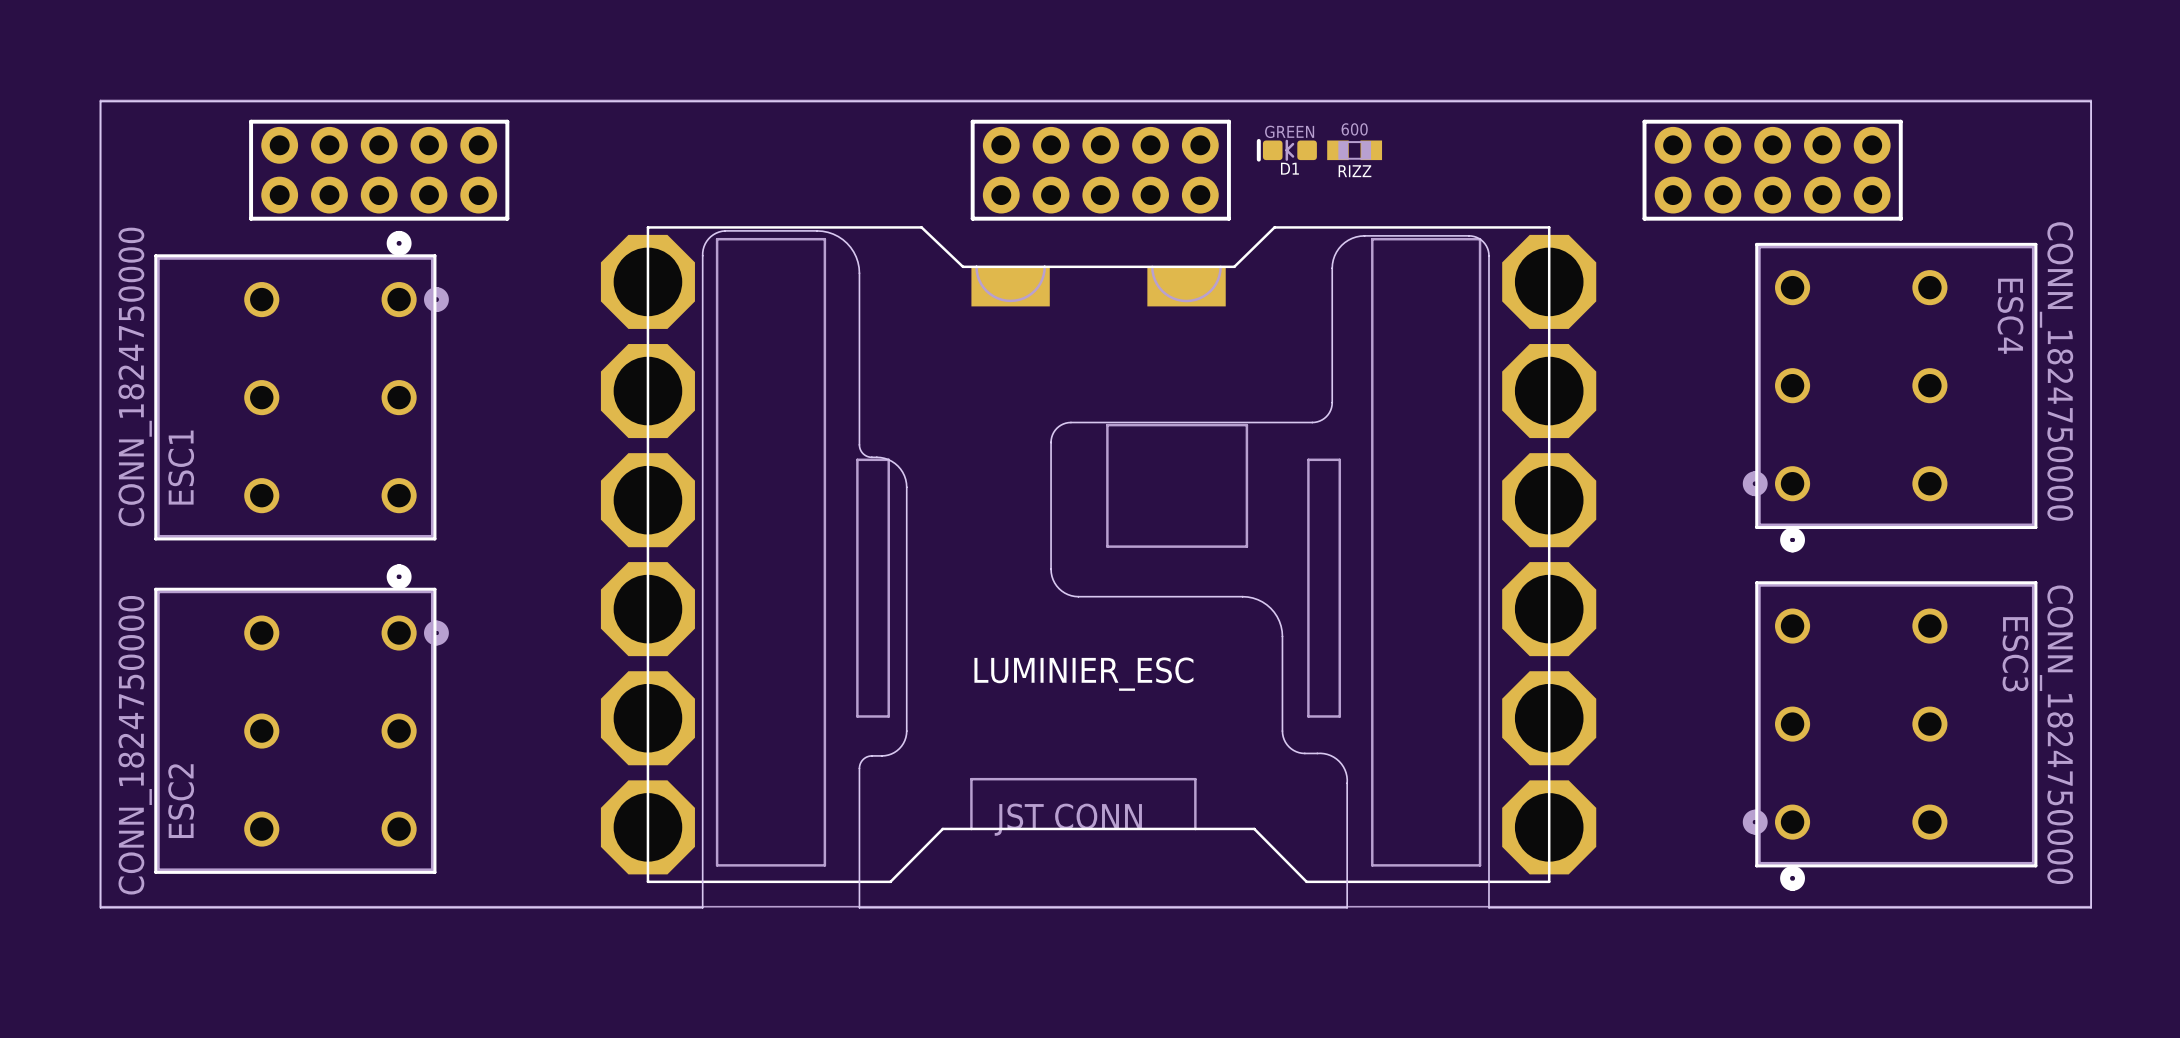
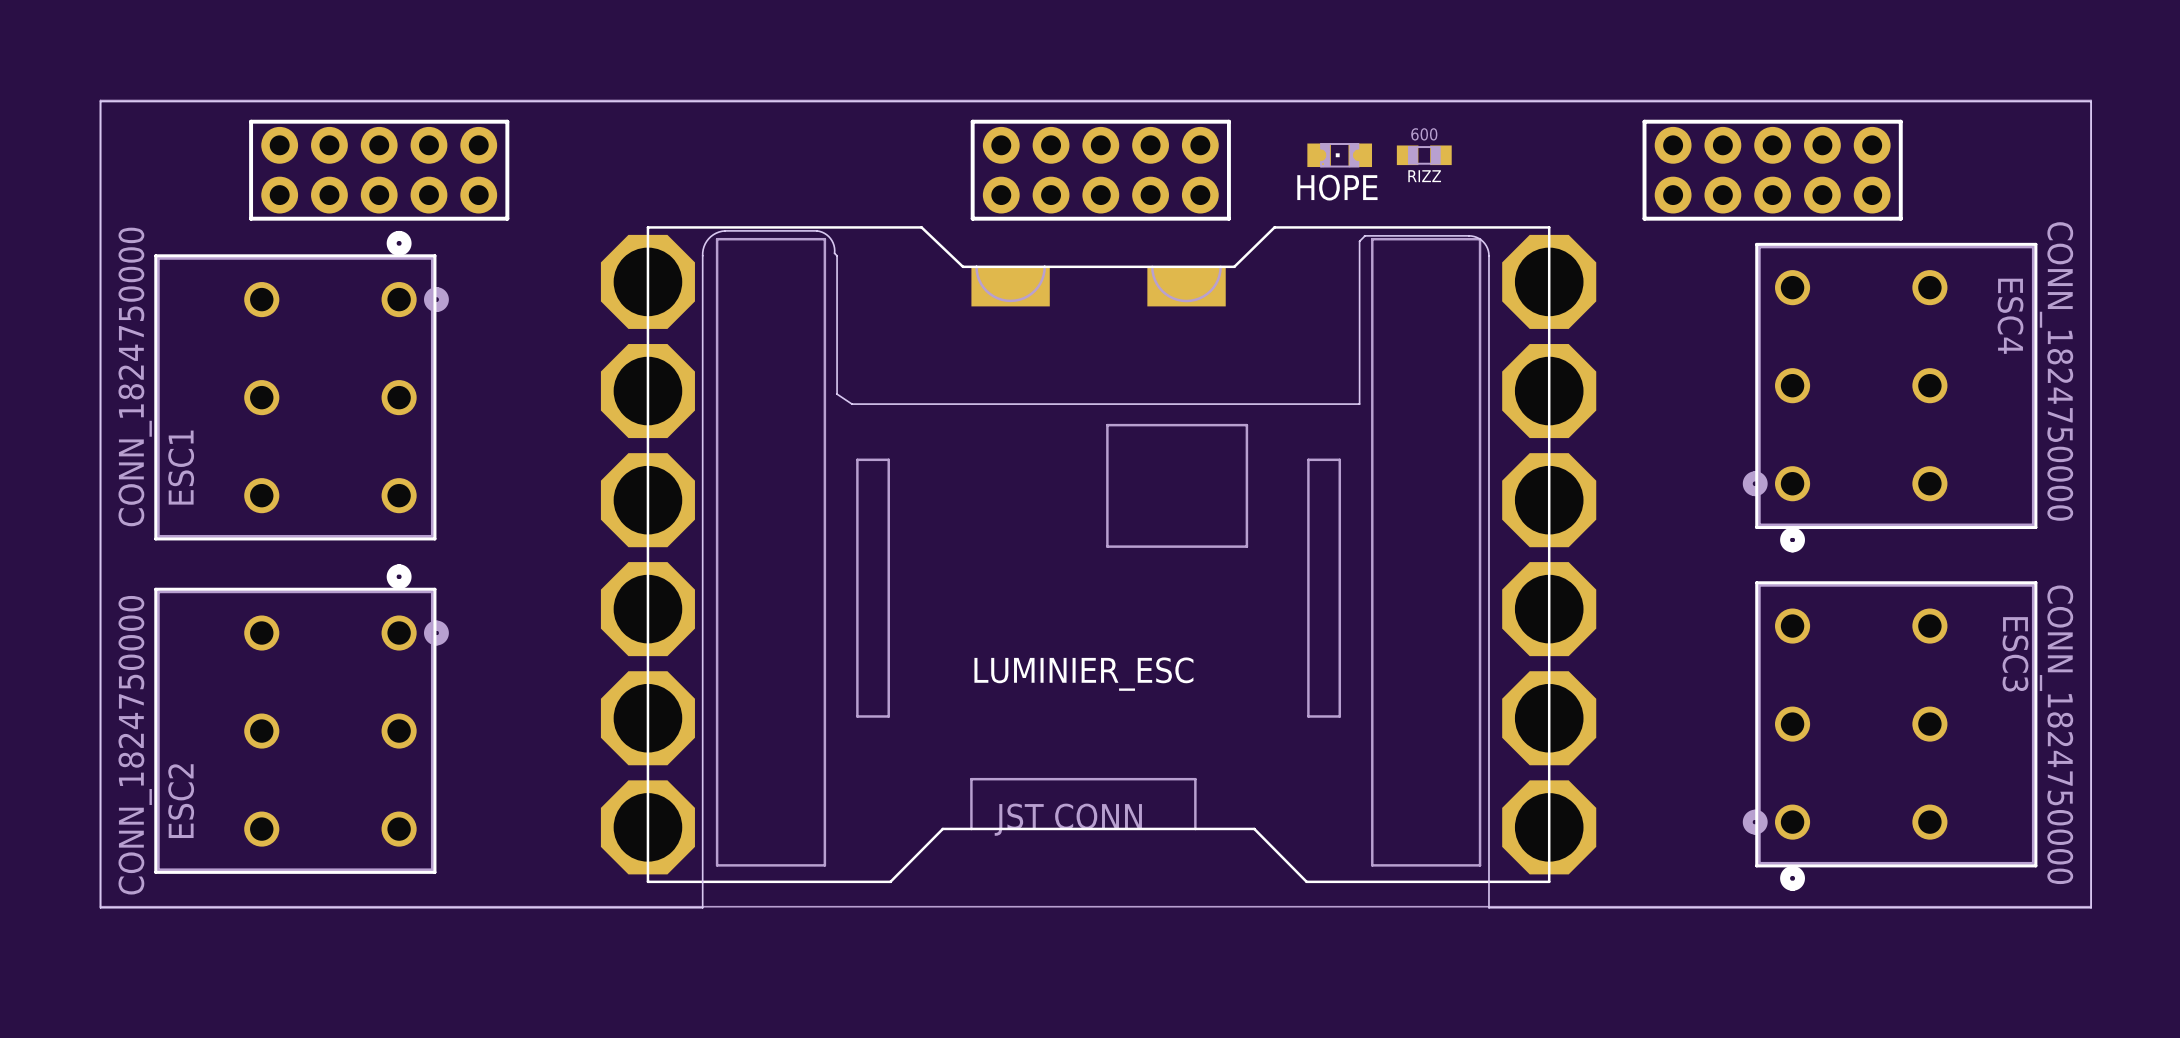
D1: GREEN (1286, 150) -> none
RIZZ position: (1354, 150) -> (1424, 155)
HOPE: none -> (1339, 155)
board edge: (817, 230) (833, 234) (842, 239) (853, 252) (859, 267) (860, 449) (867, 456) (884, 458) (895, 463) (904, 475) (906, 487) (906, 734) (903, 743) (894, 752) (885, 755) (867, 756) (859, 765) (859, 907) (1347, 907) (1346, 773) (1341, 763) (1333, 757) (1324, 753) (1296, 751) (1289, 746) (1284, 739) (1282, 731) (1282, 636) (1277, 616) (1262, 602) (1247, 597) (1078, 596) (1061, 591) (1054, 583) (1051, 572) (1051, 442) (1052, 434) (1056, 428) (1068, 422) (1312, 422) (1322, 419) (1329, 412) (1332, 405) (1333, 259) (1336, 252) (1344, 242) (1352, 238) (1364, 235) -> (817, 230) (824, 233) (830, 238) (837, 255) (837, 394) (851, 404) (1359, 404) (1359, 241) (1365, 235)

